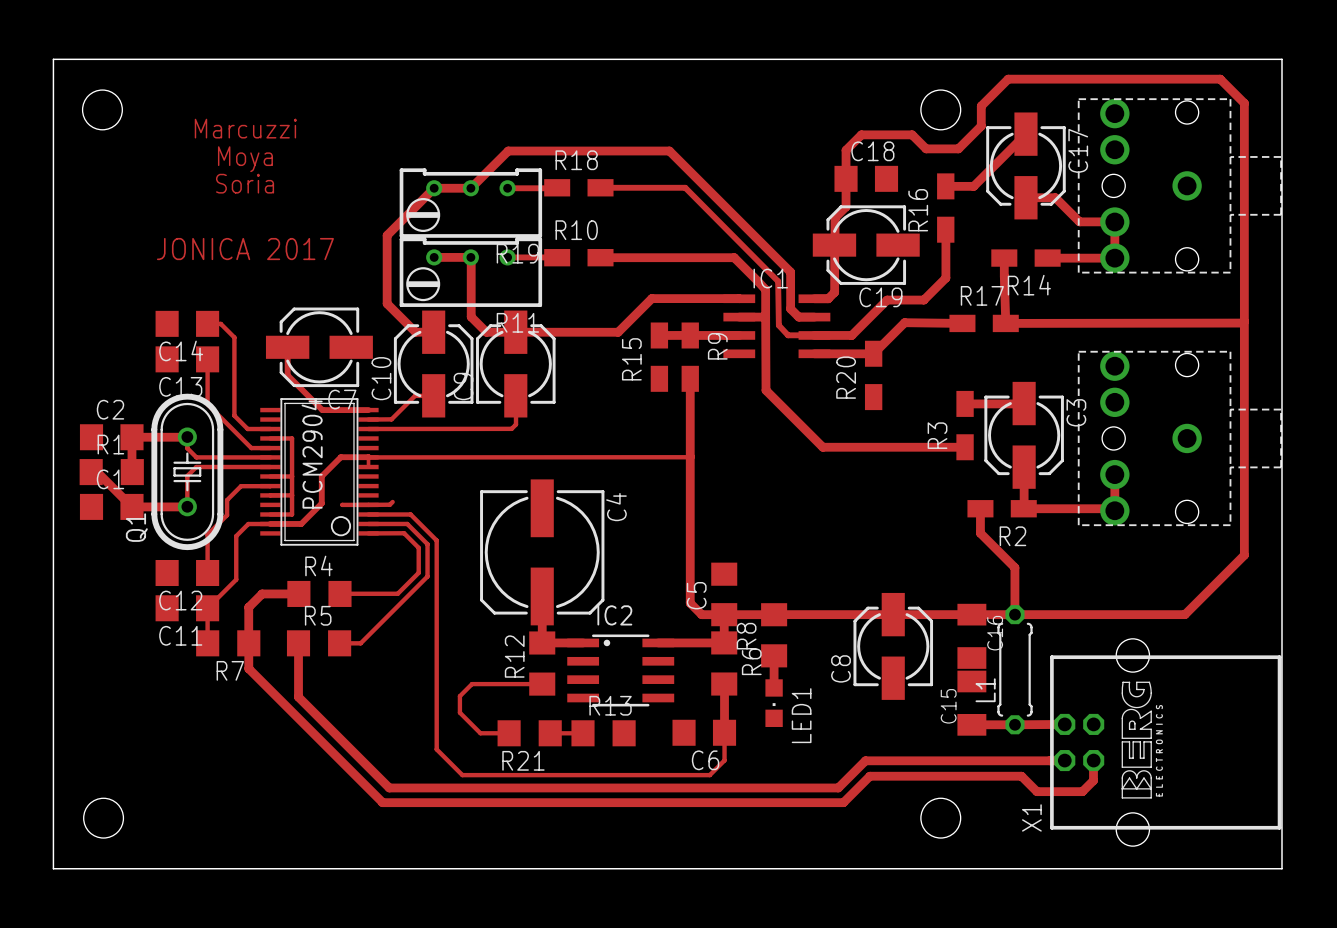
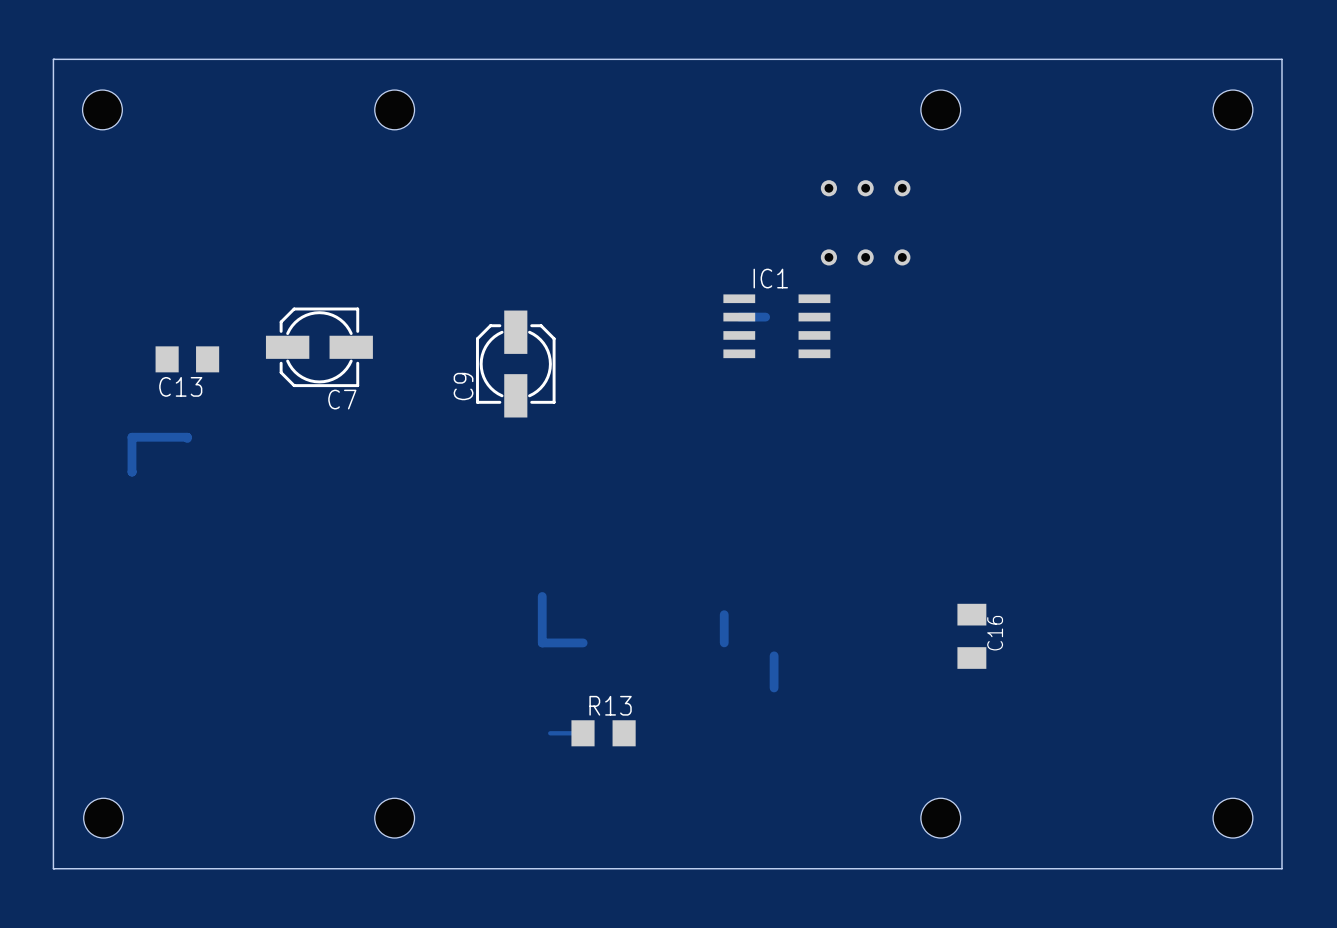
hole: none -> (394, 109)
hole: none -> (1232, 109)
text: Marcuzzi (245, 128) -> none
track: (1025, 134) (973, 186) (945, 186) -> none
text: Moya (245, 159) -> none
C17: (1025, 165) -> none
C18: (866, 178) -> none
text: Soria (245, 183) -> none
part: (1179, 185) -> none
track: (557, 187) (507, 188) -> none
R18: (578, 187) -> none
track: (600, 187) (685, 187) (778, 281) (778, 325) (788, 335) (814, 335) -> none
part: none -> (865, 188)
track: (1025, 197) (1055, 197) (1079, 221) (1114, 221) -> none
R19: (470, 203) -> none
R16: (945, 208) -> none
track: (1114, 222) (1114, 258) (1047, 258) -> none
track: (945, 229) (945, 278) (923, 300) (887, 300) (851, 335) (814, 335) (814, 333) -> none
track: (834, 244) (834, 292) (828, 298) (814, 298) -> none
track: (834, 245) (835, 217) (846, 206) (846, 150) (861, 134) (912, 134) (926, 148) (958, 148) (981, 126) (981, 106) (1008, 79) (1220, 79) (1244, 103) (1244, 555) (1184, 614) (774, 614) -> none
C19: (866, 245) -> none
text: JONICA 2017 (245, 249) -> none
track: (434, 257) (471, 257) (471, 316) (486, 332) (618, 332) (651, 298) (739, 298) -> none
track: (507, 257) (557, 257) -> none
R10: (578, 257) -> none
track: (600, 257) (734, 257) (765, 289) (766, 390) (822, 447) (965, 447) -> none
part: none -> (865, 257)
track: (1004, 258) (1005, 323) (1244, 321) -> none
R14: (1025, 258) -> none
R11: (470, 272) -> none
track: (814, 317) (798, 317) (790, 308) (790, 272) (669, 151) (508, 151) (470, 188) (434, 188) (387, 235) (387, 303) (415, 332) (433, 332) -> none
C14: (187, 323) -> none
track: (207, 323) (220, 323) (234, 337) (234, 415) (247, 429) (270, 429) -> none
track: (962, 323) (904, 322) (873, 353) -> none
R17: (984, 323) -> none
track: (739, 335) (659, 335) -> none
track: (287, 347) (287, 375) (322, 410) (368, 410) -> none
track: (814, 353) (873, 353) -> none
R15: (659, 357) -> none
R9: (690, 357) -> none
track: (207, 359) (207, 404) (251, 448) (270, 448) -> none
C10: (433, 364) -> none
R20: (873, 375) -> none
track: (690, 378) (690, 603) (701, 614) (774, 614) -> none
track: (433, 395) (415, 395) (391, 419) (368, 419) -> none
track: (515, 395) (516, 424) (511, 428) (368, 429) -> none
track: (1024, 403) (965, 403) -> none
R3: (965, 425) -> none
C3: (1024, 435) -> none
C2: (111, 437) -> none
track: (187, 437) (187, 448) (196, 457) (270, 457) -> none
track: (270, 438) (292, 438) (292, 514) (270, 514) -> none
part: (1179, 438) -> none
track: (690, 456) (368, 457) -> none
track: (368, 457) (340, 457) (321, 476) (321, 503) (301, 523) (248, 524) (236, 536) (236, 579) (207, 608) (207, 643) -> none
track: (368, 457) (368, 467) -> none
track: (270, 467) (196, 467) (187, 475) (187, 506) -> none
track: (1024, 467) (1023, 508) (1112, 508) (1114, 510) (1114, 474) -> none
Q1: (187, 471) -> none
PCM2904: (319, 471) -> none
track: (91, 472) (97, 472) (131, 506) (187, 506) -> none
R1: (111, 472) -> none
track: (270, 476) (292, 476) -> none
track: (270, 486) (241, 486) (227, 500) (227, 515) (207, 534) (207, 573) -> none
track: (270, 495) (292, 495) -> none
track: (392, 501) (389, 504) (342, 504) -> none
C1: (111, 506) -> none
track: (980, 508) (980, 533) (1014, 567) (1014, 614) -> none
R2: (1002, 508) -> none
track: (368, 514) (410, 514) (436, 540) (436, 749) (462, 775) (709, 775) (724, 760) (724, 684) -> none
track: (375, 524) (368, 523) (407, 523) (427, 544) (427, 576) (360, 643) (339, 643) -> none
track: (368, 533) (404, 533) (418, 547) (418, 572) (397, 593) (339, 593) -> none
C4: (542, 552) -> none
C12: (187, 573) -> none
track: (298, 593) (262, 593) (248, 607) (248, 668) (382, 802) (843, 802) (869, 776) (1021, 776) (1036, 791) (1082, 791) (1093, 780) (1093, 760) -> none
R4: (319, 593) -> none
C5: (724, 594) -> none
C11: (187, 608) -> none
R8: (774, 635) -> none
track: (658, 642) (724, 642) -> none
R7: (228, 643) -> none
track: (298, 643) (298, 697) (389, 787) (838, 787) (865, 760) (1064, 760) -> none
R5: (319, 643) -> none
C8: (893, 646) -> none
R12: (542, 663) -> none
R6: (724, 663) -> none
L1: (1014, 669) -> none
IC2: (620, 670) -> none
track: (542, 684) (472, 684) (459, 696) (459, 712) (480, 733) (509, 733) -> none
LED1: (774, 703) -> none
C15: (971, 703) -> none
track: (971, 724) (1064, 724) (1049, 724) -> none
C6: (704, 732) -> none
R21: (529, 733) -> none
X1: (1165, 742) -> none
hole: none -> (394, 818)
hole: none -> (1232, 818)

